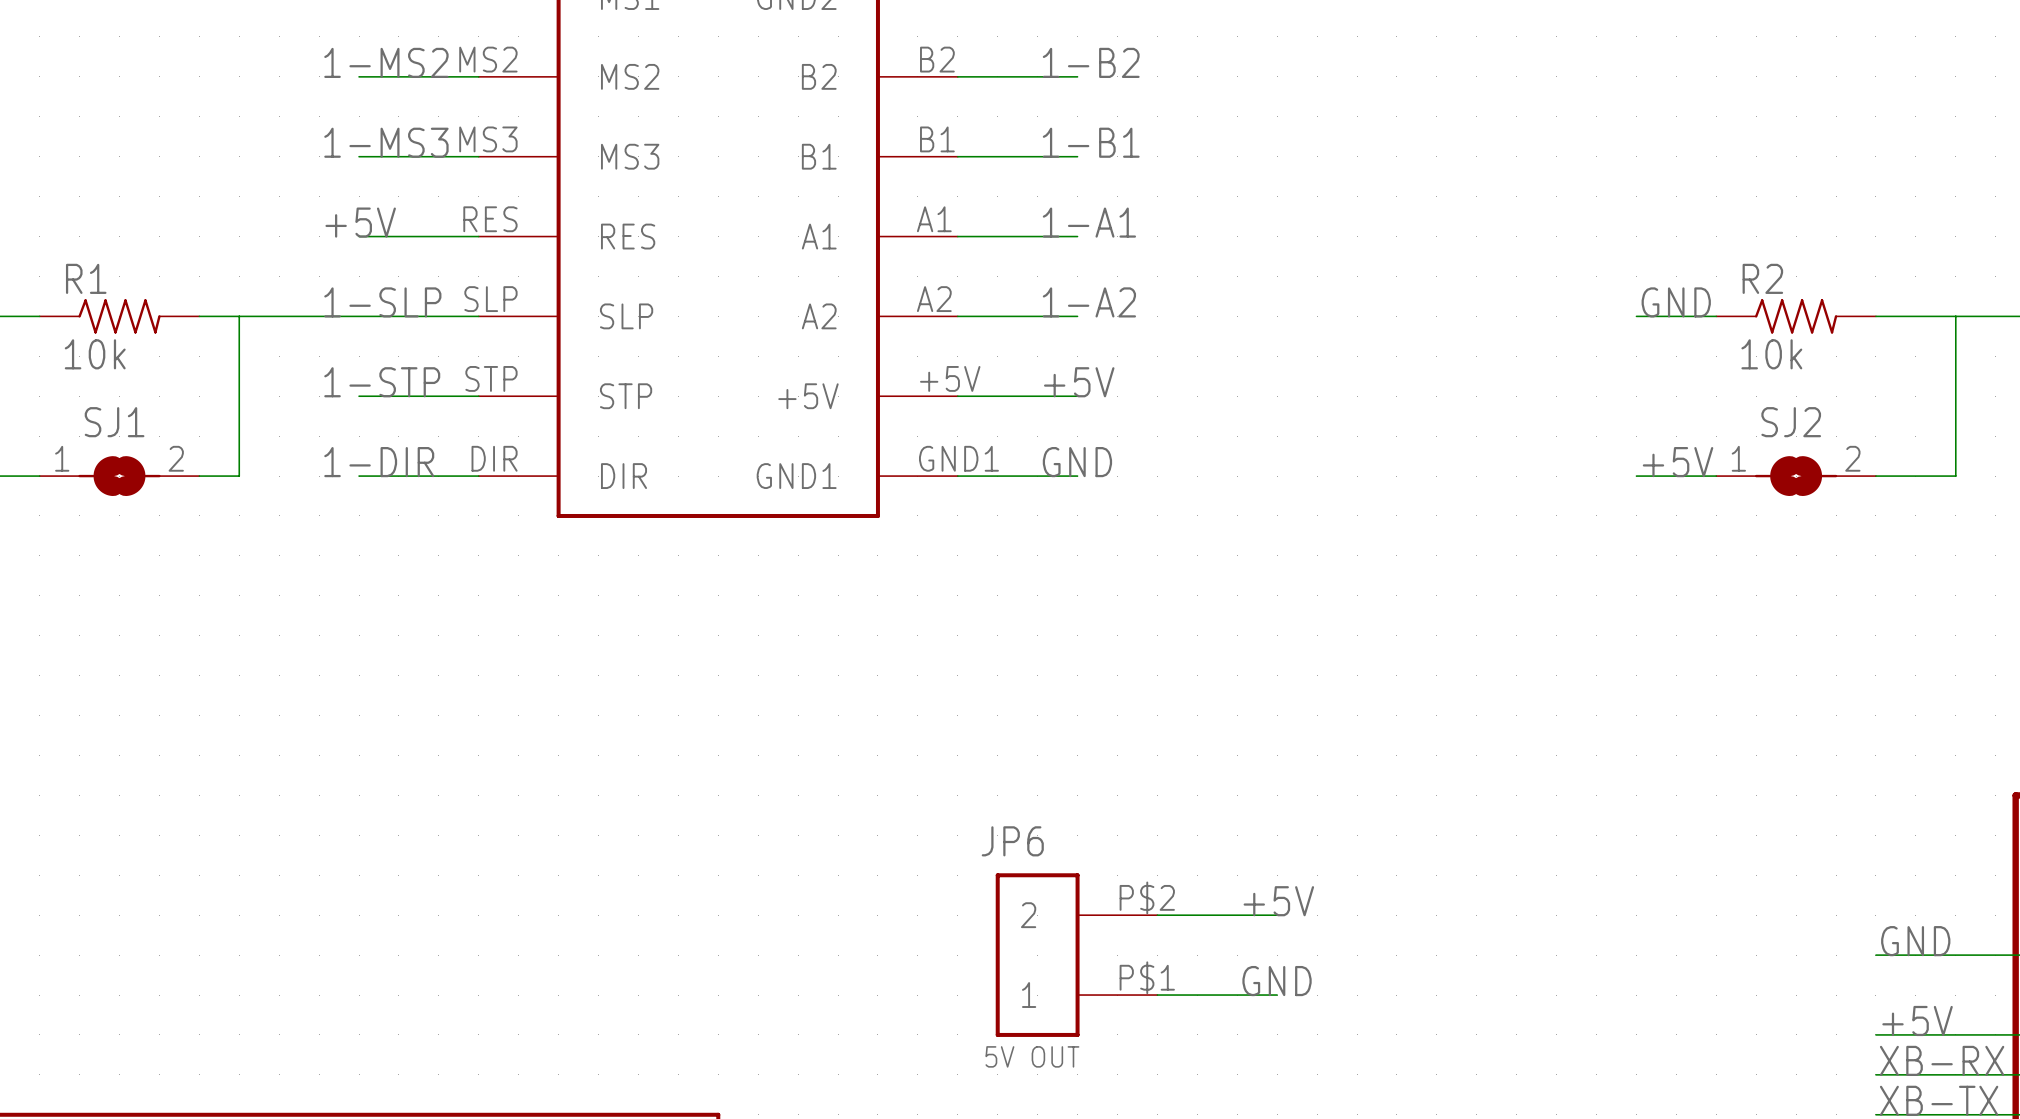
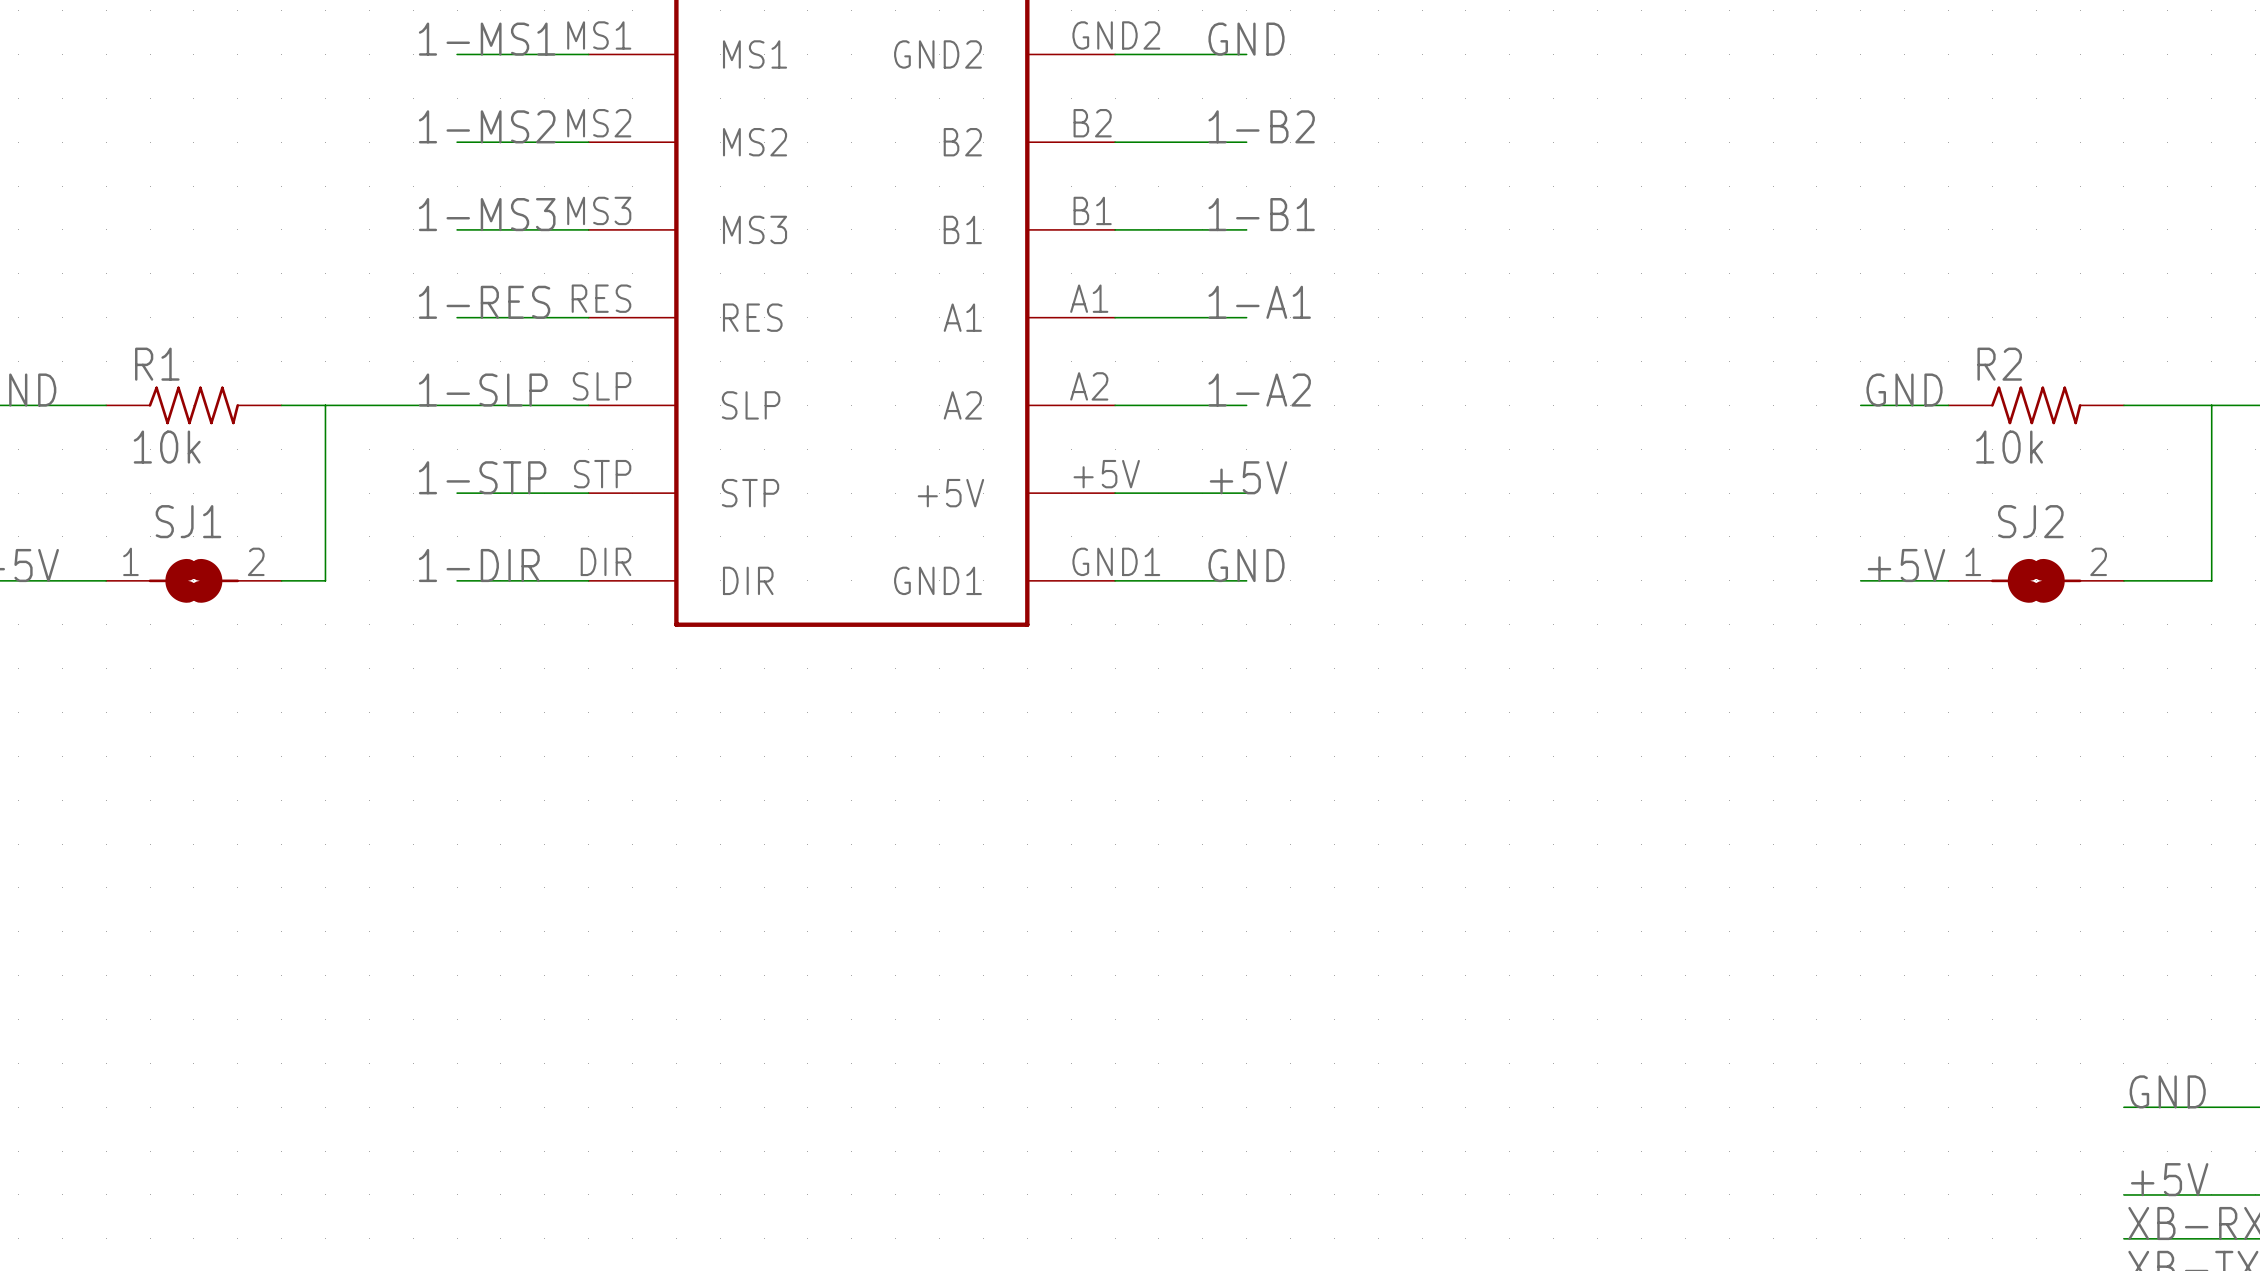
label: +5V (360, 222) -> 1-RES (484, 302)
label: +5V (1278, 901) -> none
wire: (1157, 915) (1277, 915) -> none
JP6: 5V OUT (1076, 955) -> none
label: GND (1277, 981) -> none
wire: (1157, 995) (1277, 995) -> none

